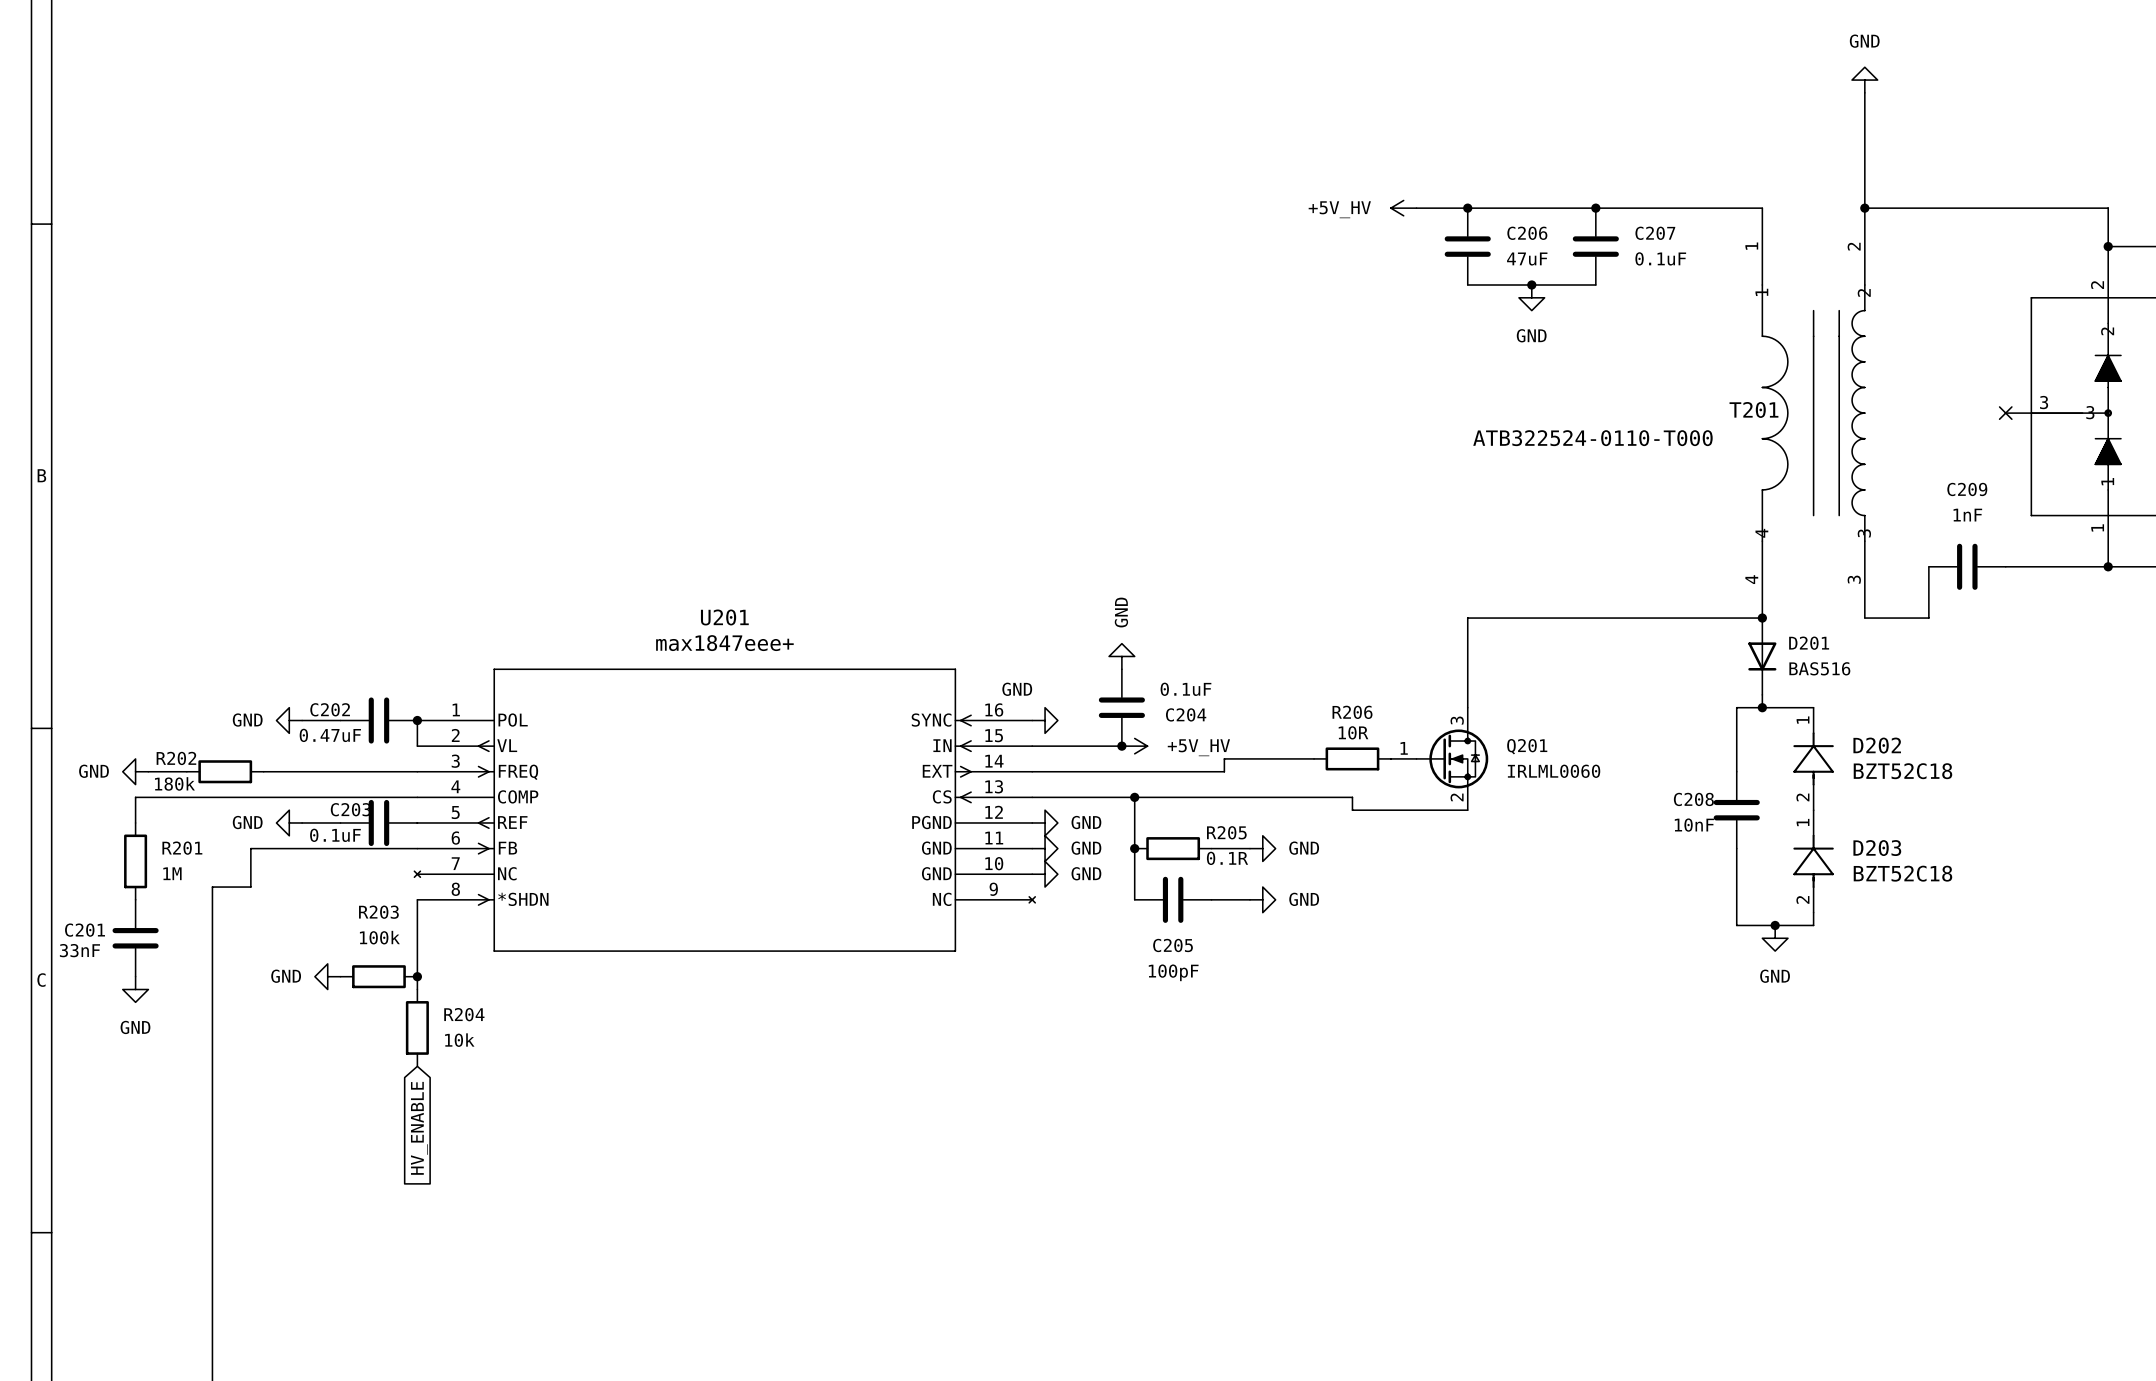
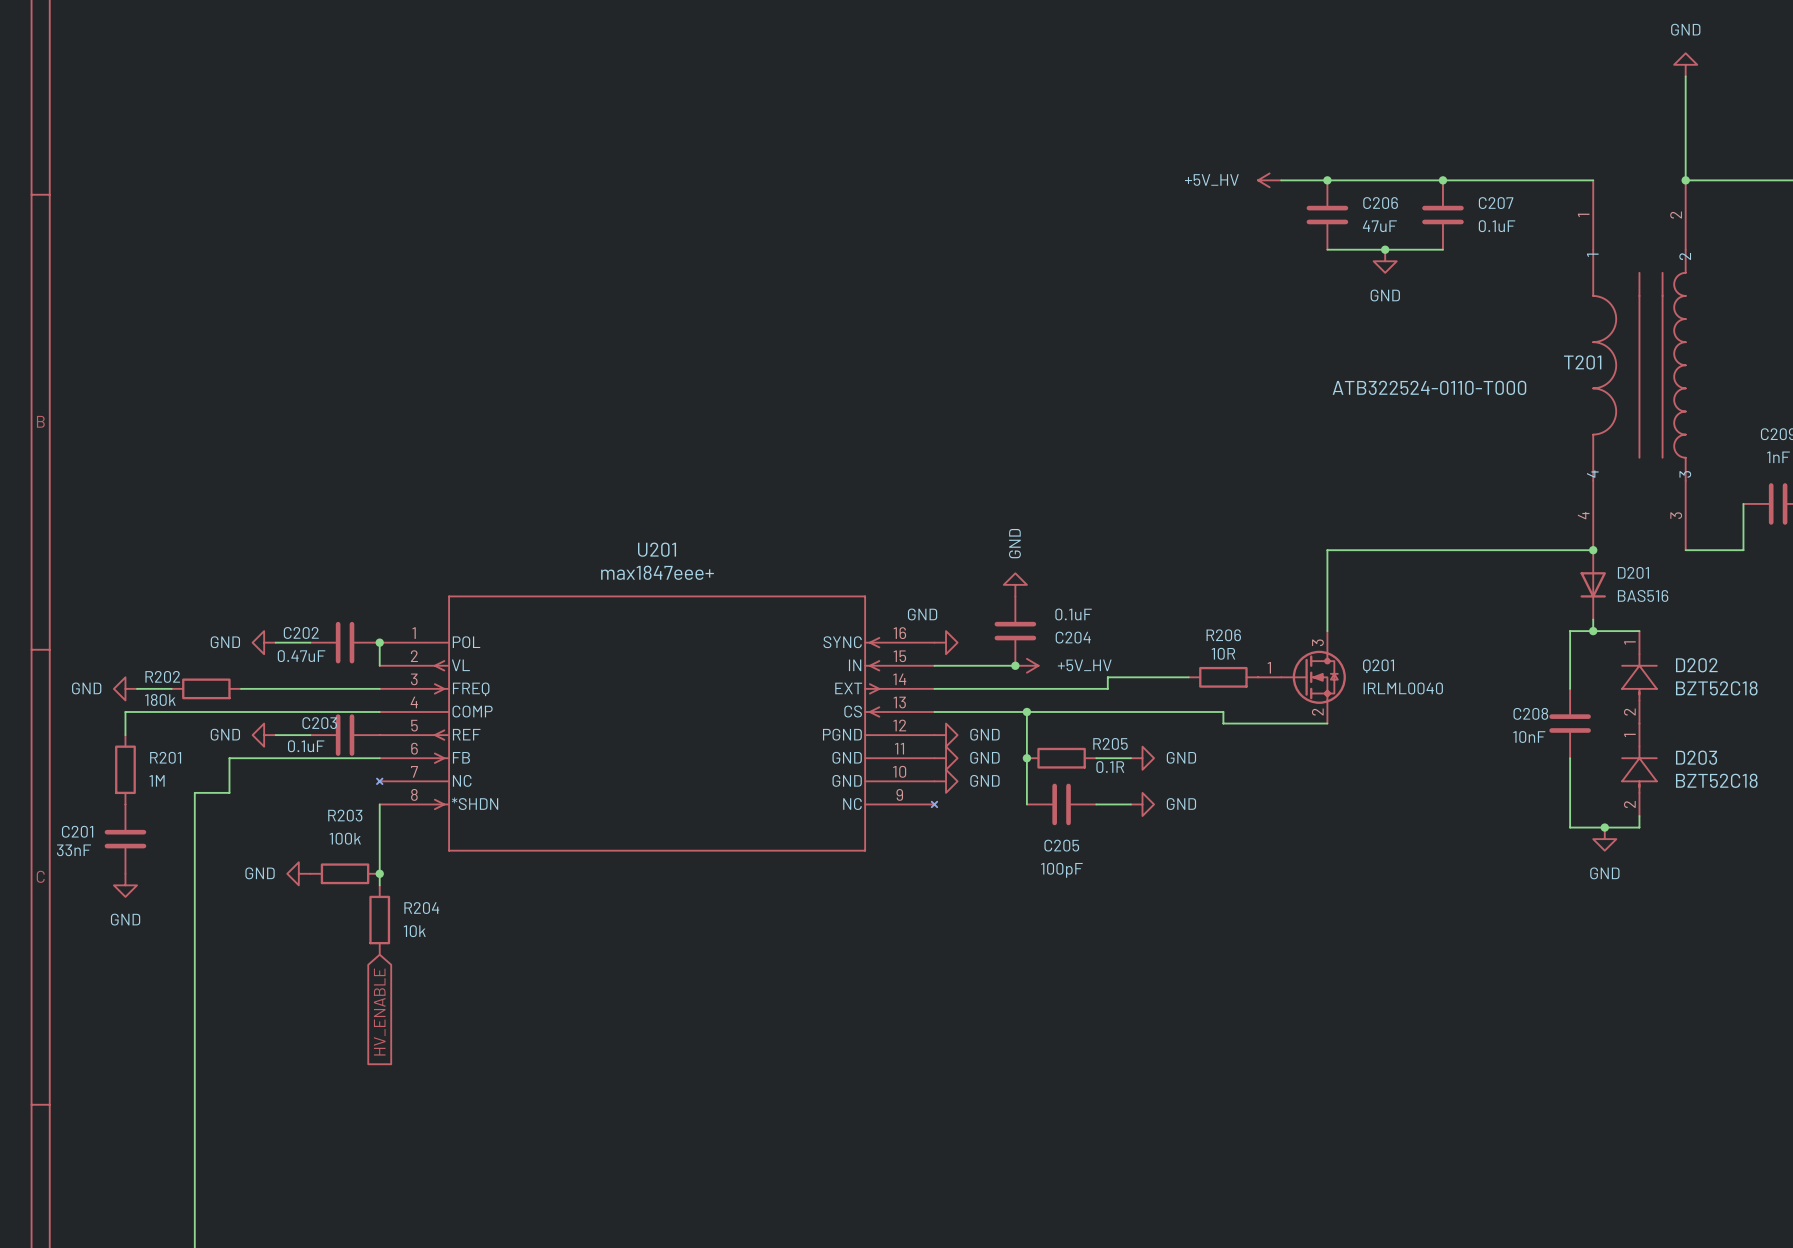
Q201 value: IRLML0060 (1554, 771) -> IRLML0040 (1403, 688)

